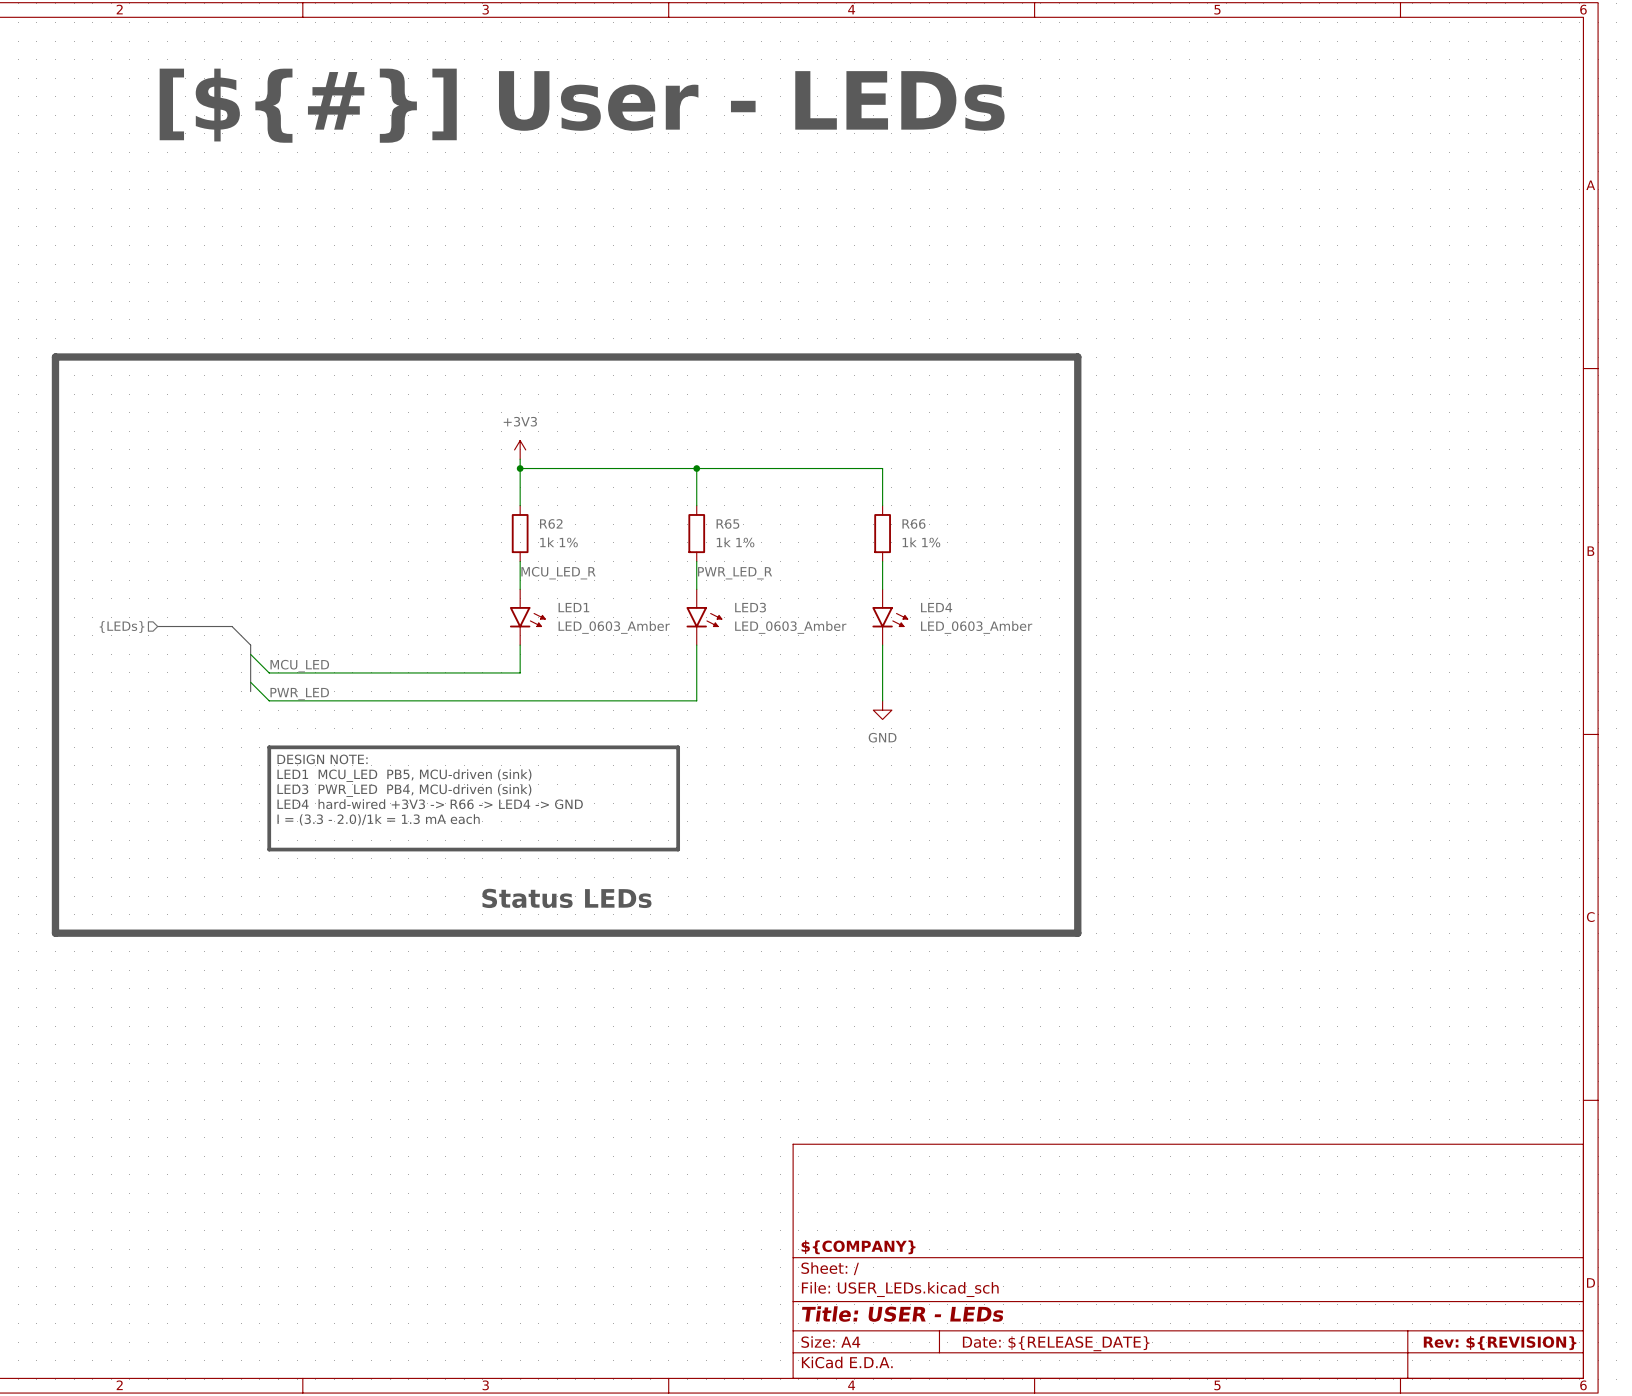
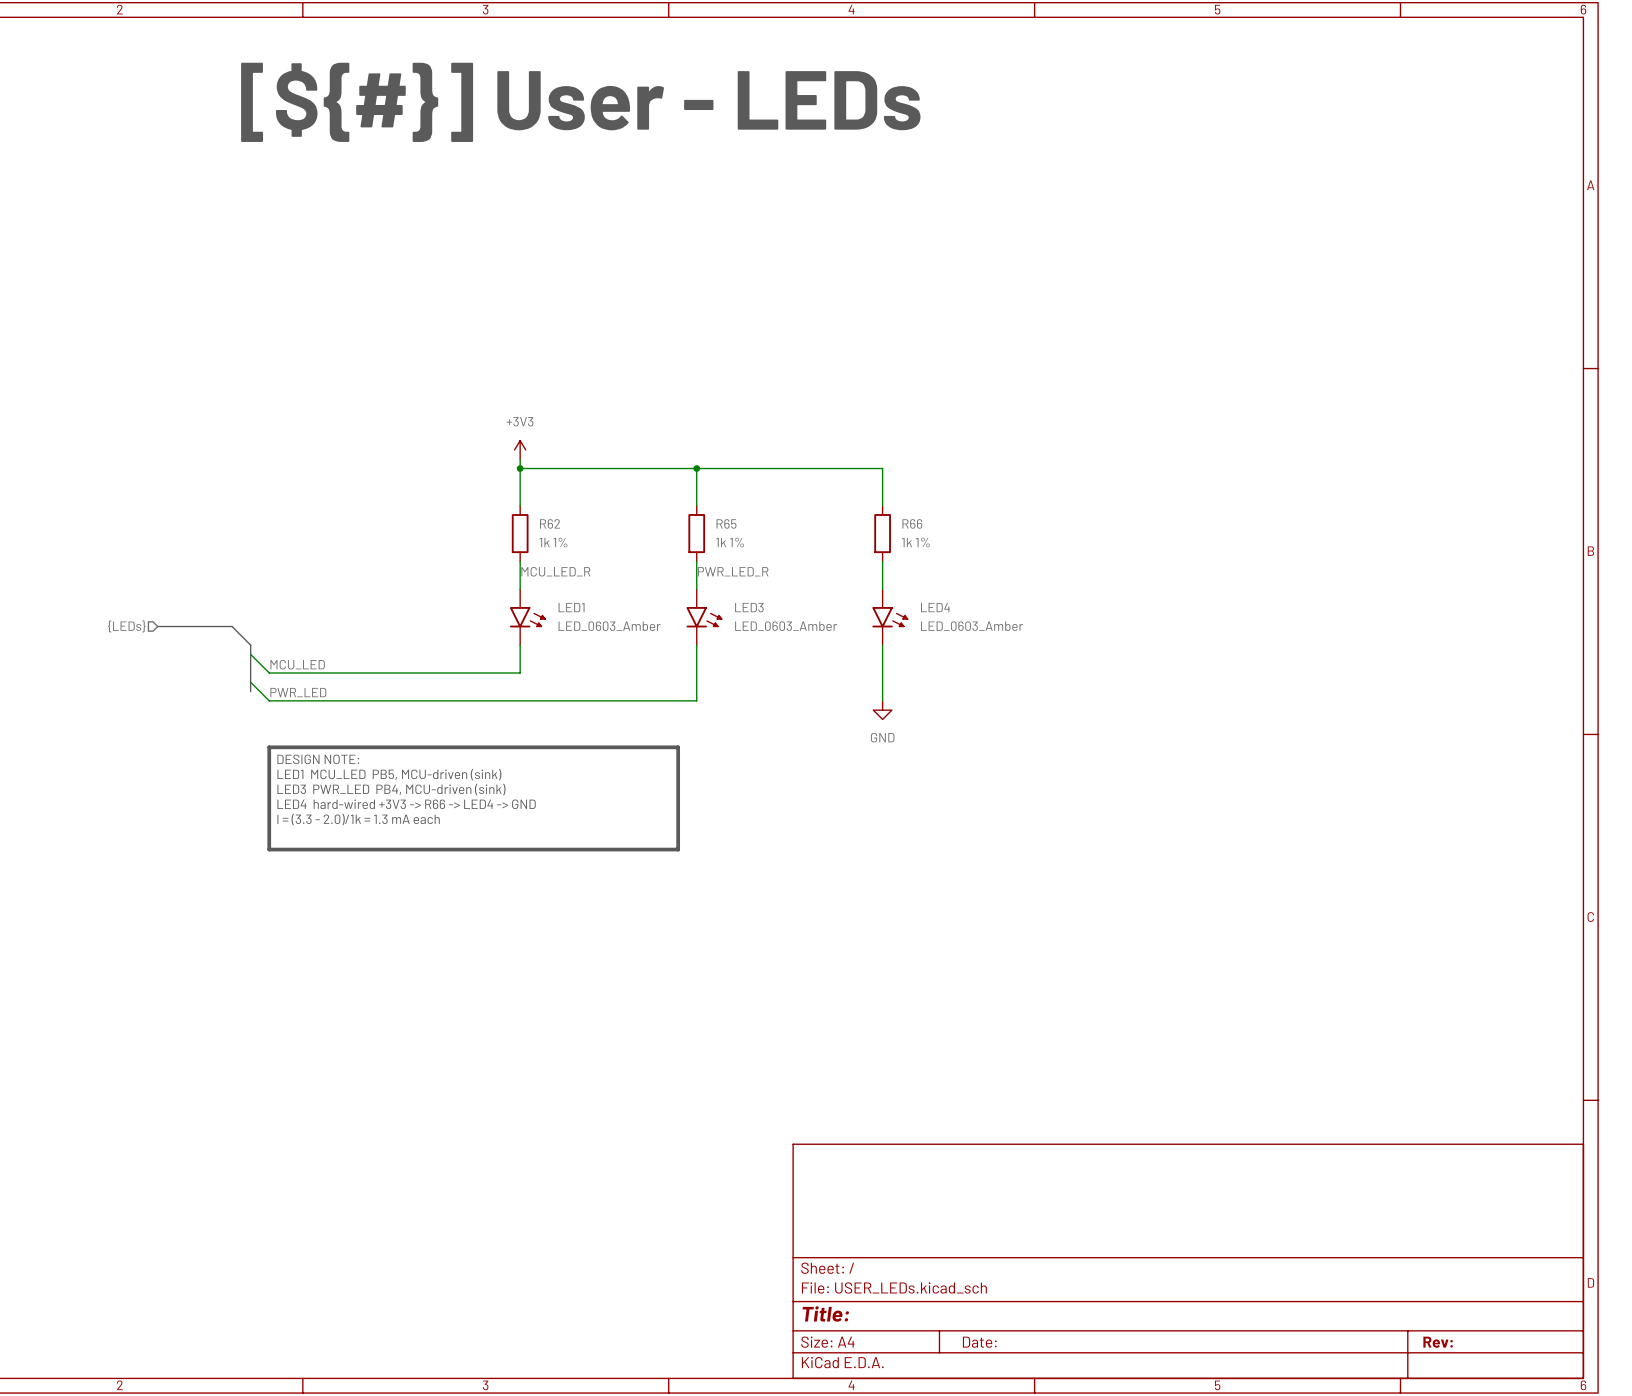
line: (55, 357) (1077, 357) (1077, 933) (55, 933) (55, 357) -> none
text: Status LEDs (566, 898) -> none
title block: ${COMPANY} (858, 1247) -> none
title block: Title: USER - LEDs (902, 1314) -> Title: (825, 1313)
title block: Date: ${RELEASE_DATE} (1056, 1343) -> Date: (979, 1342)
title block: Rev: ${REVISION} (1500, 1343) -> Rev: (1438, 1342)

